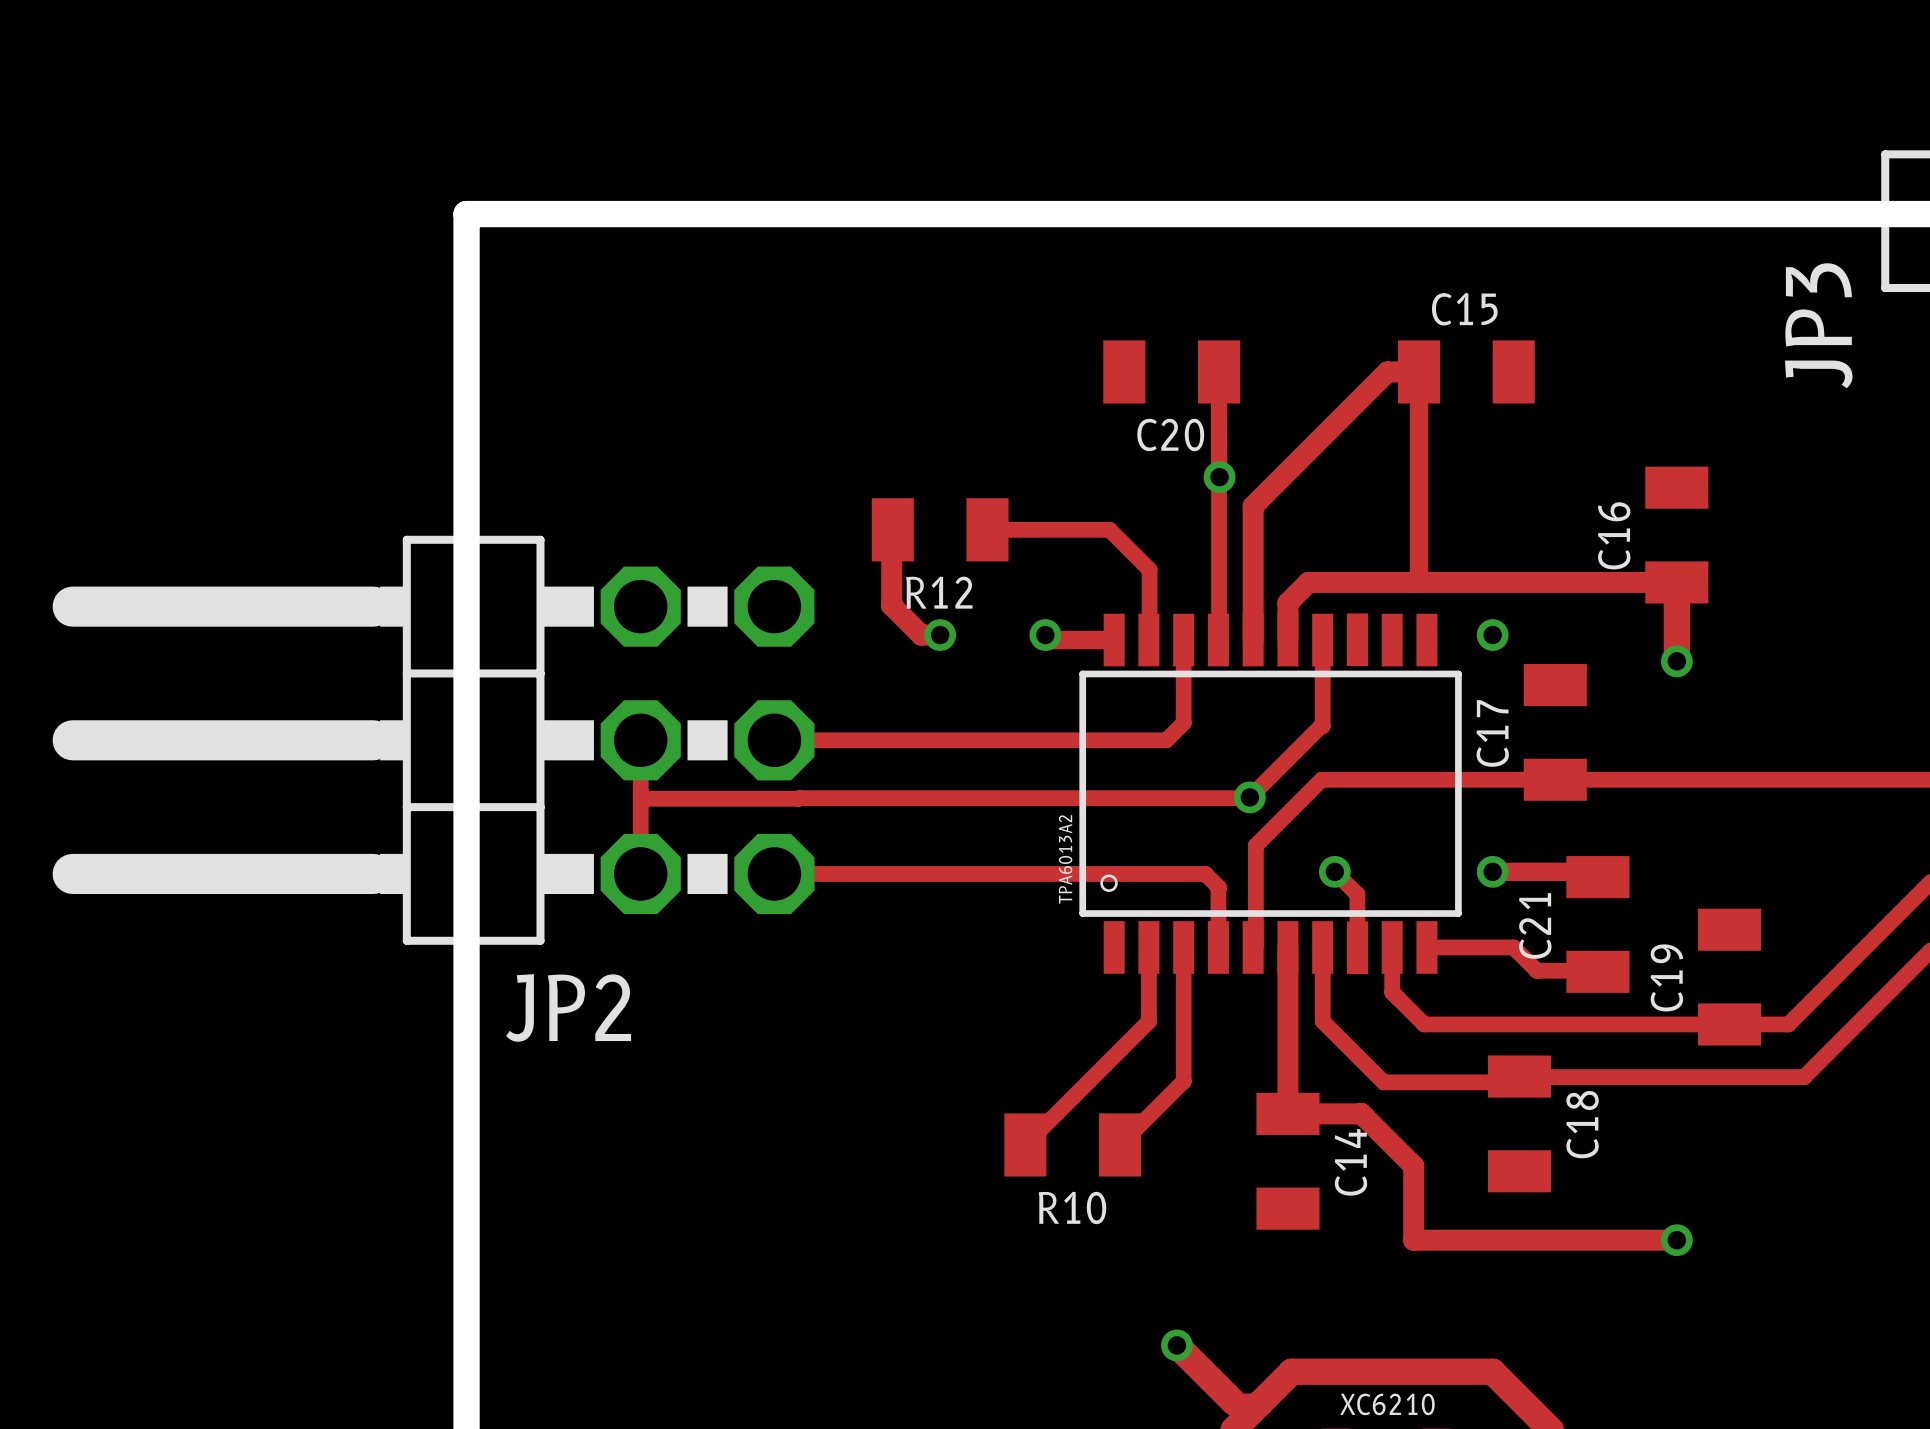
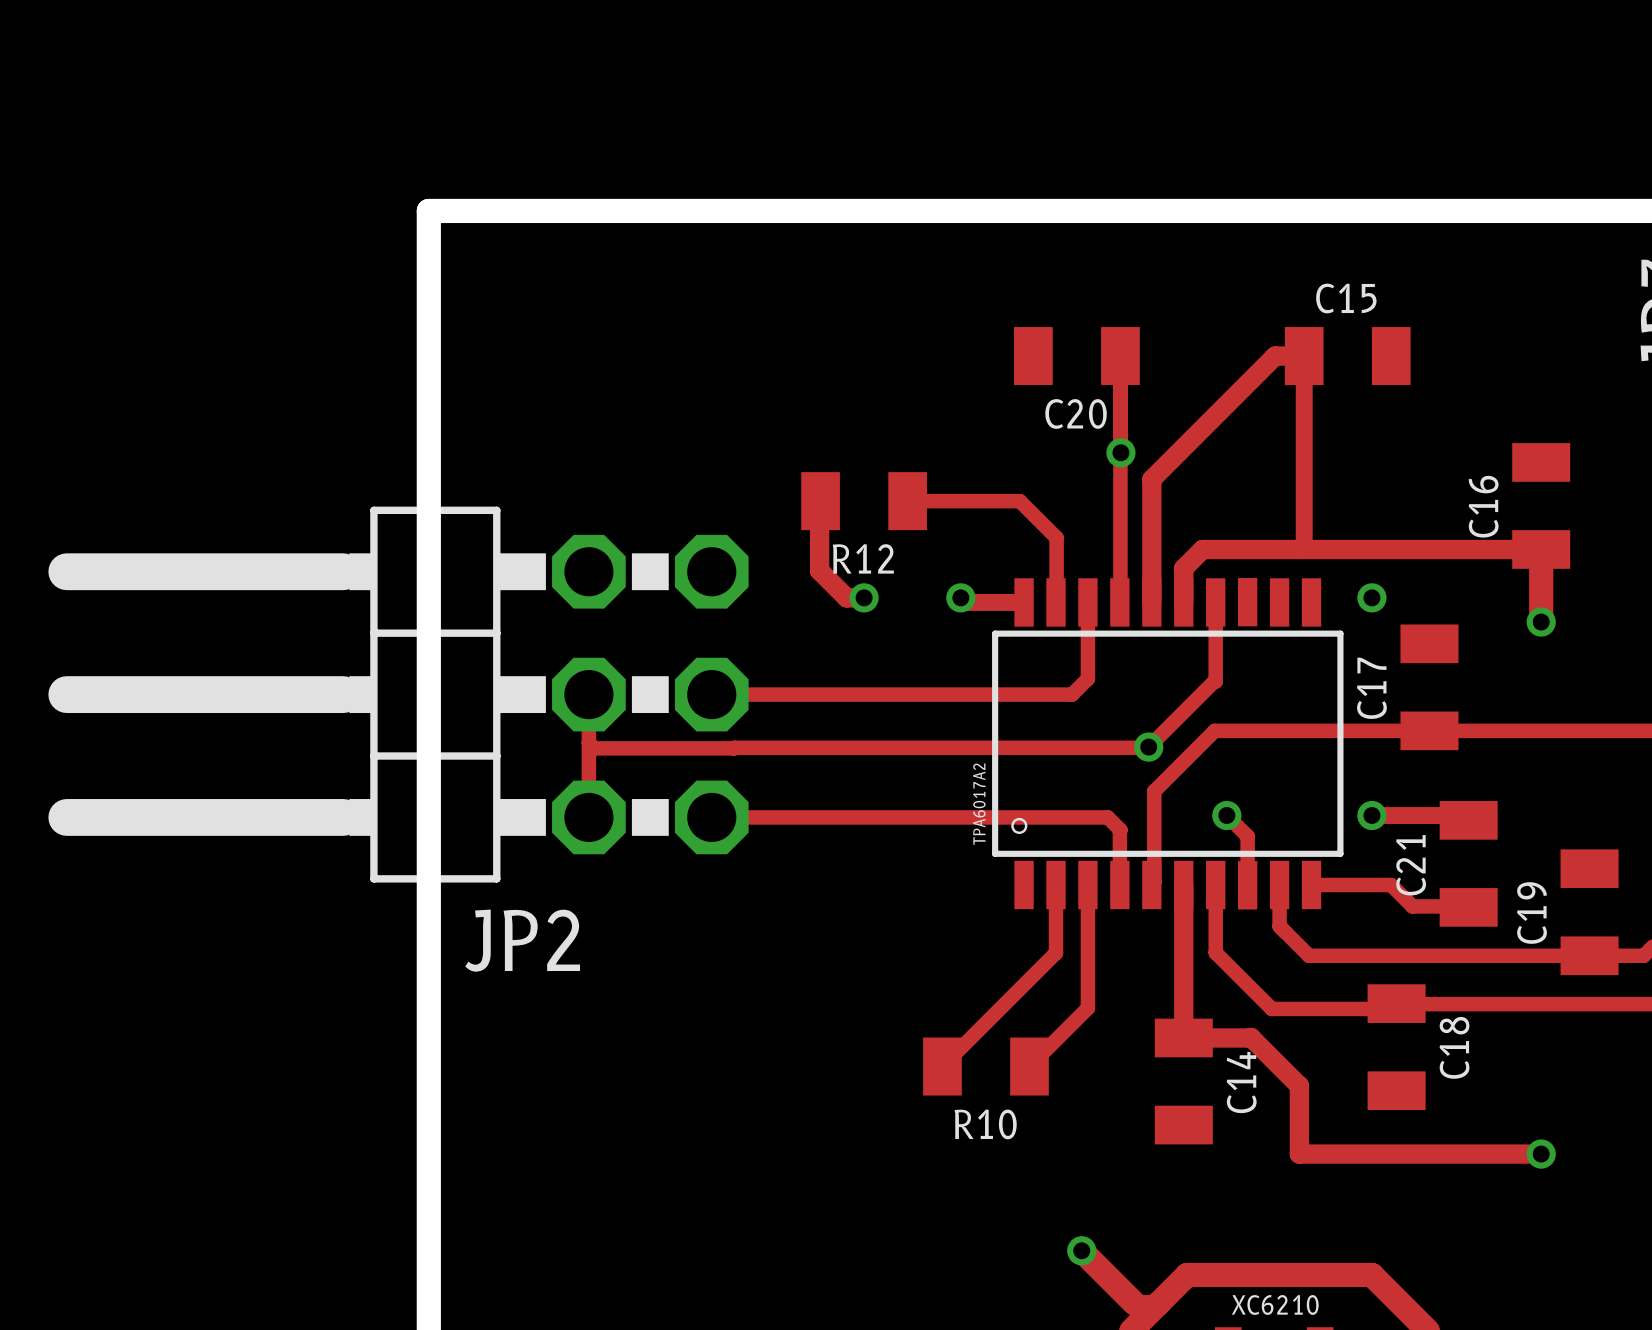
TPA6013A2 name: TPA6013A2 (1065, 859) -> TPA6017A2 (979, 804)

